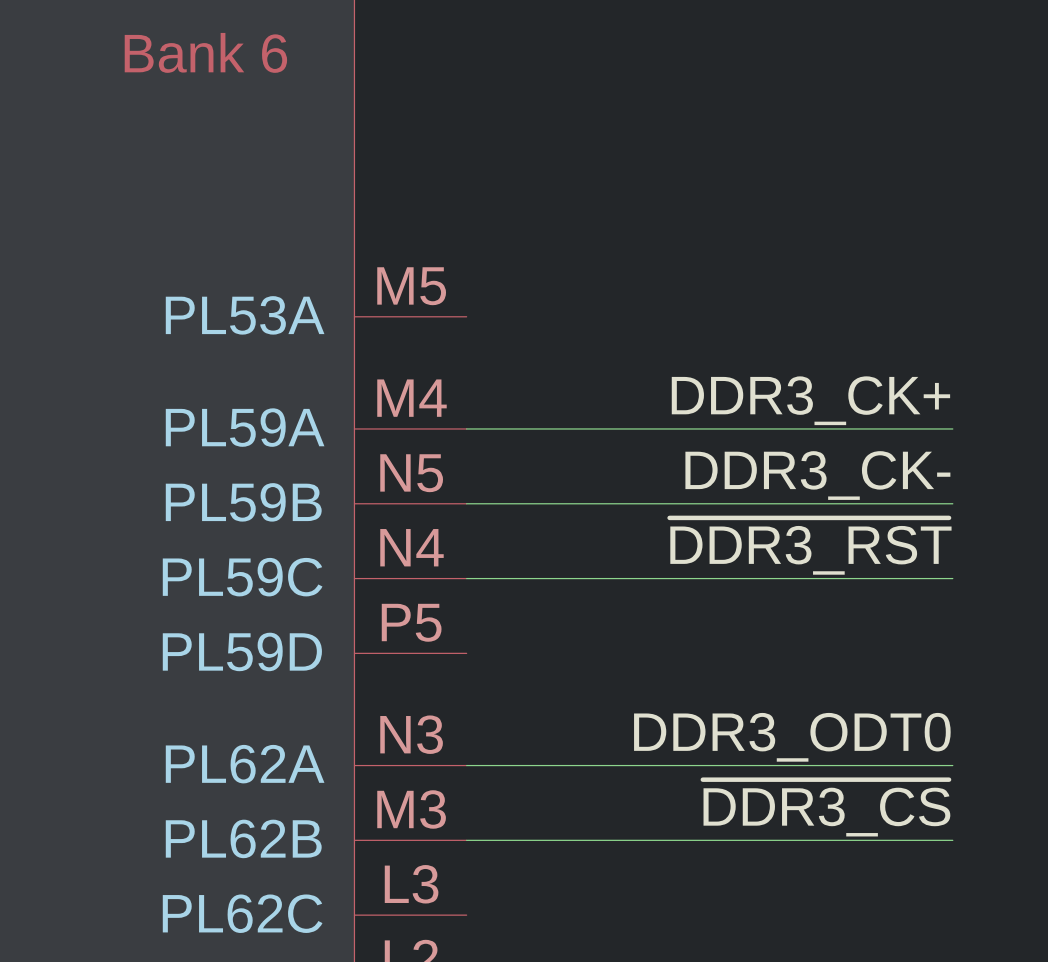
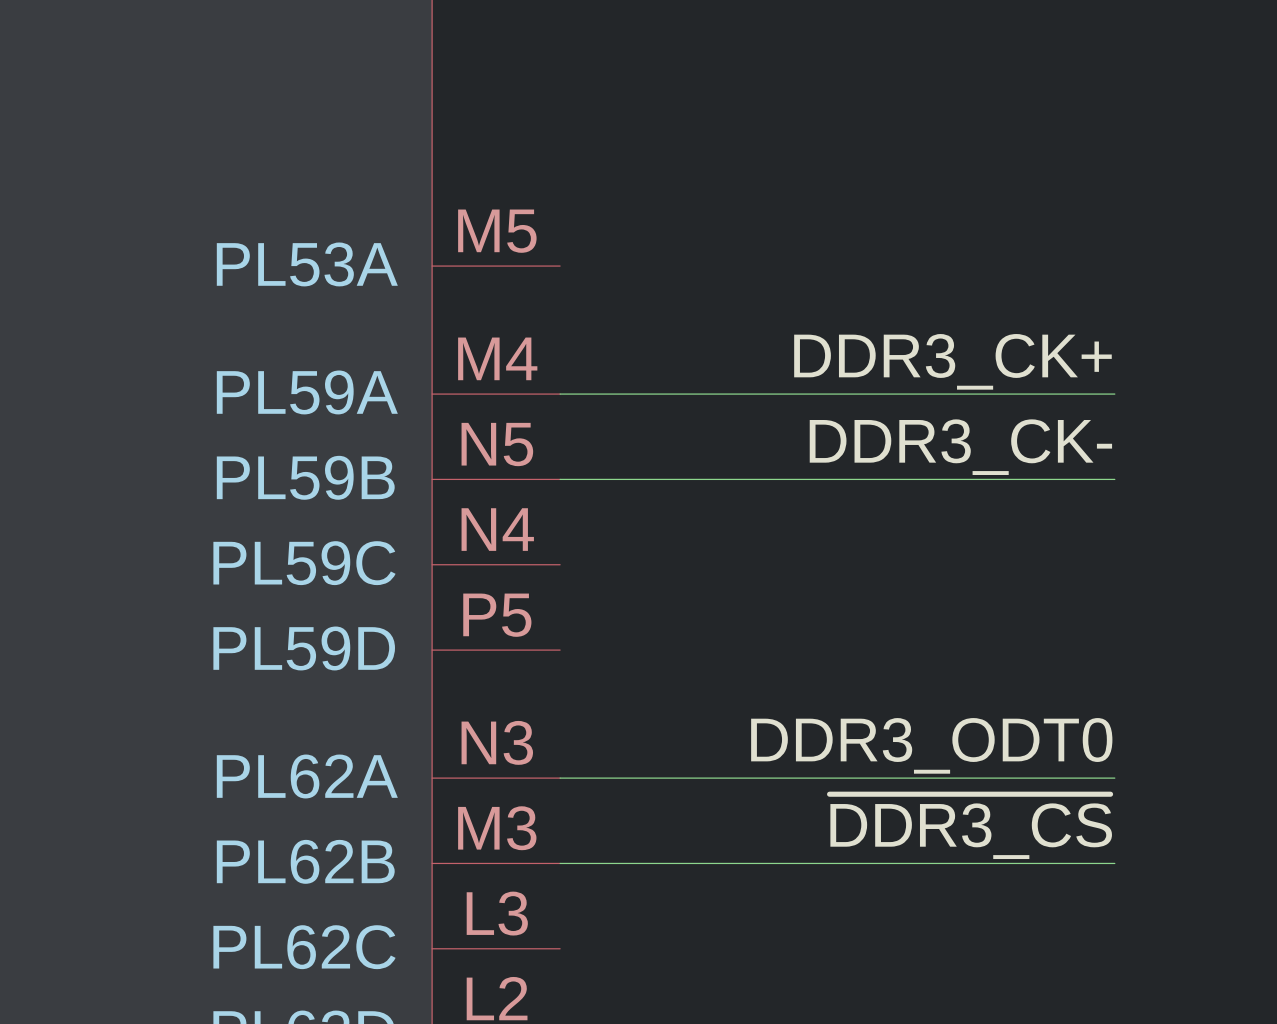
label: ~{DDR3_RST} (810, 546) -> none
wire: (466, 578) (952, 578) -> none

